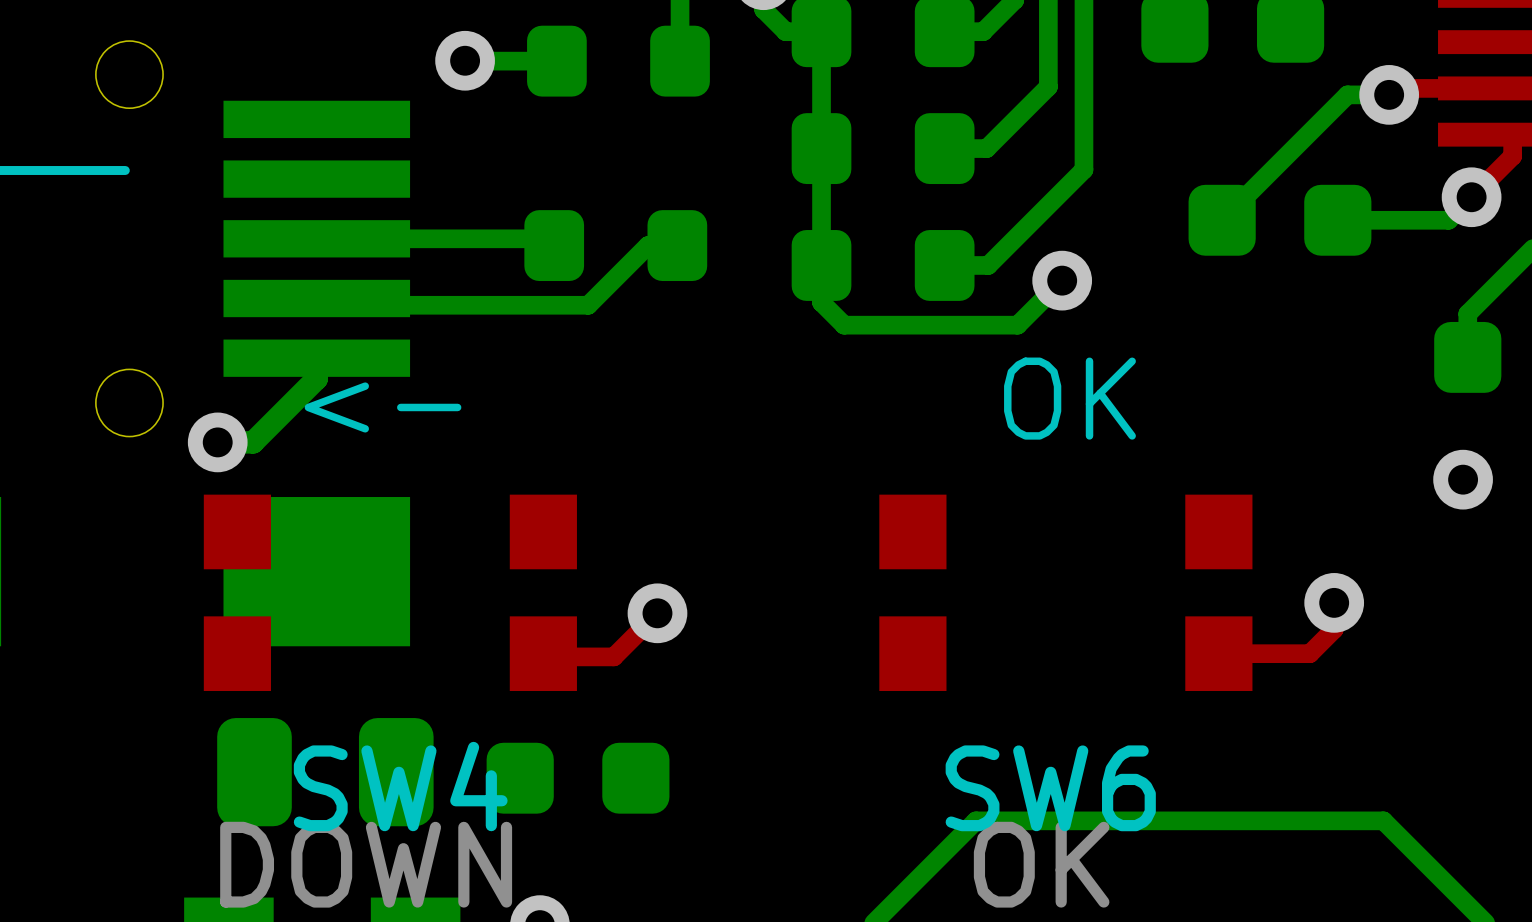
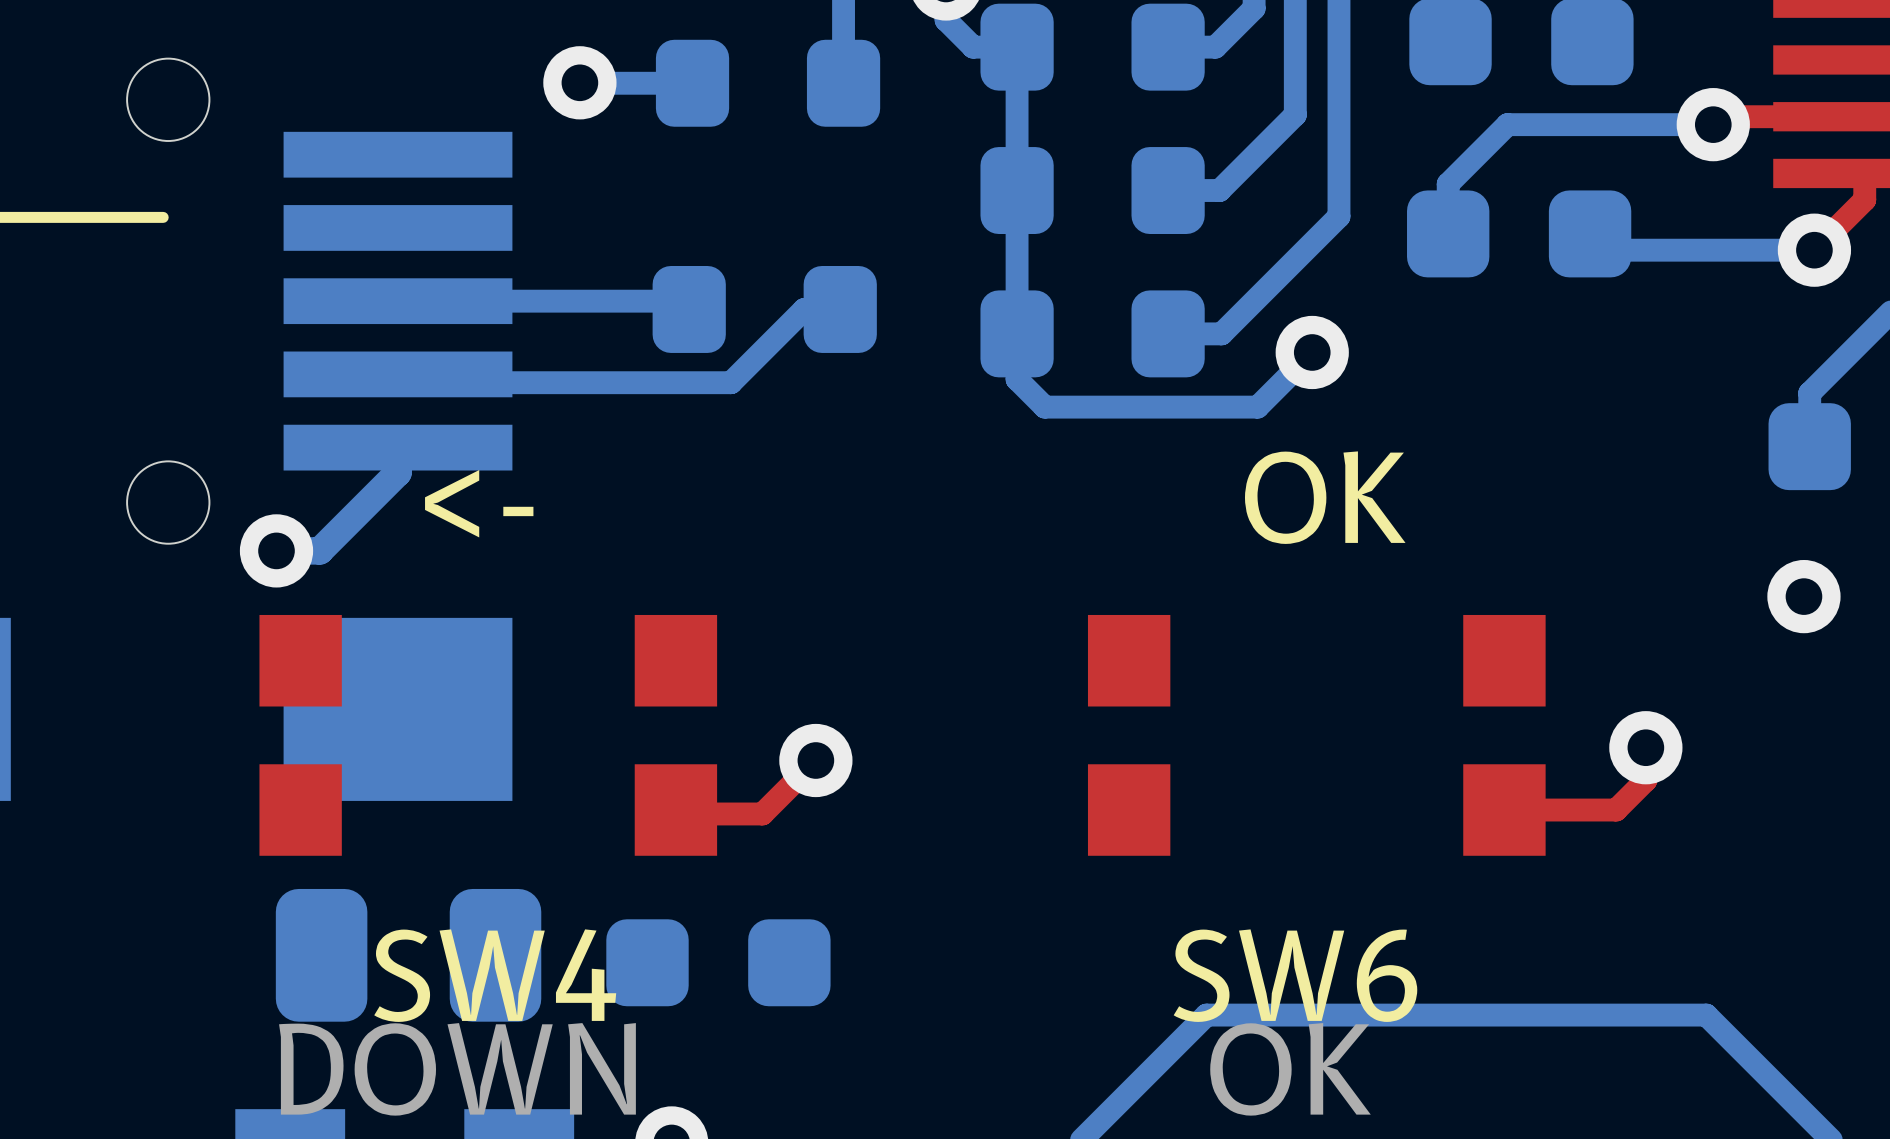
bottom track: (1347, 94) (1222, 220) -> (1662, 124) (1507, 124) (1448, 183) (1448, 233)
bottom track: (1471, 197) (1448, 220) (1337, 220) -> (1814, 250) (1606, 250) (1590, 233)
part position: (1279, 220) -> (1519, 233)

